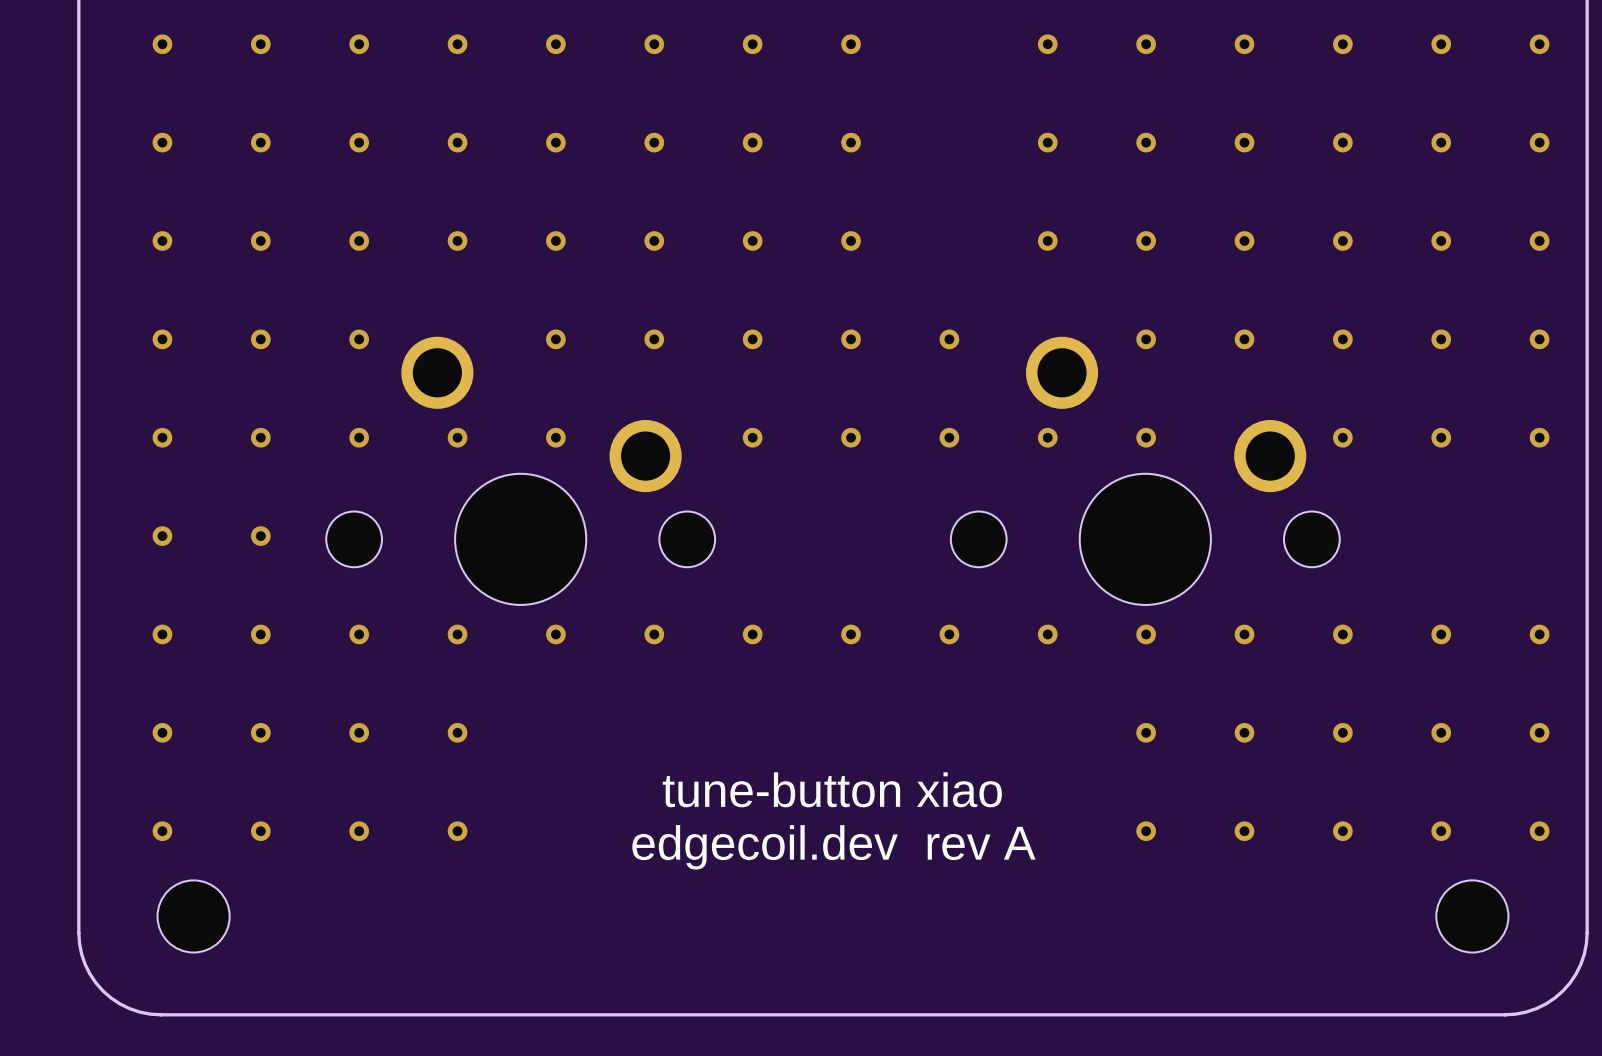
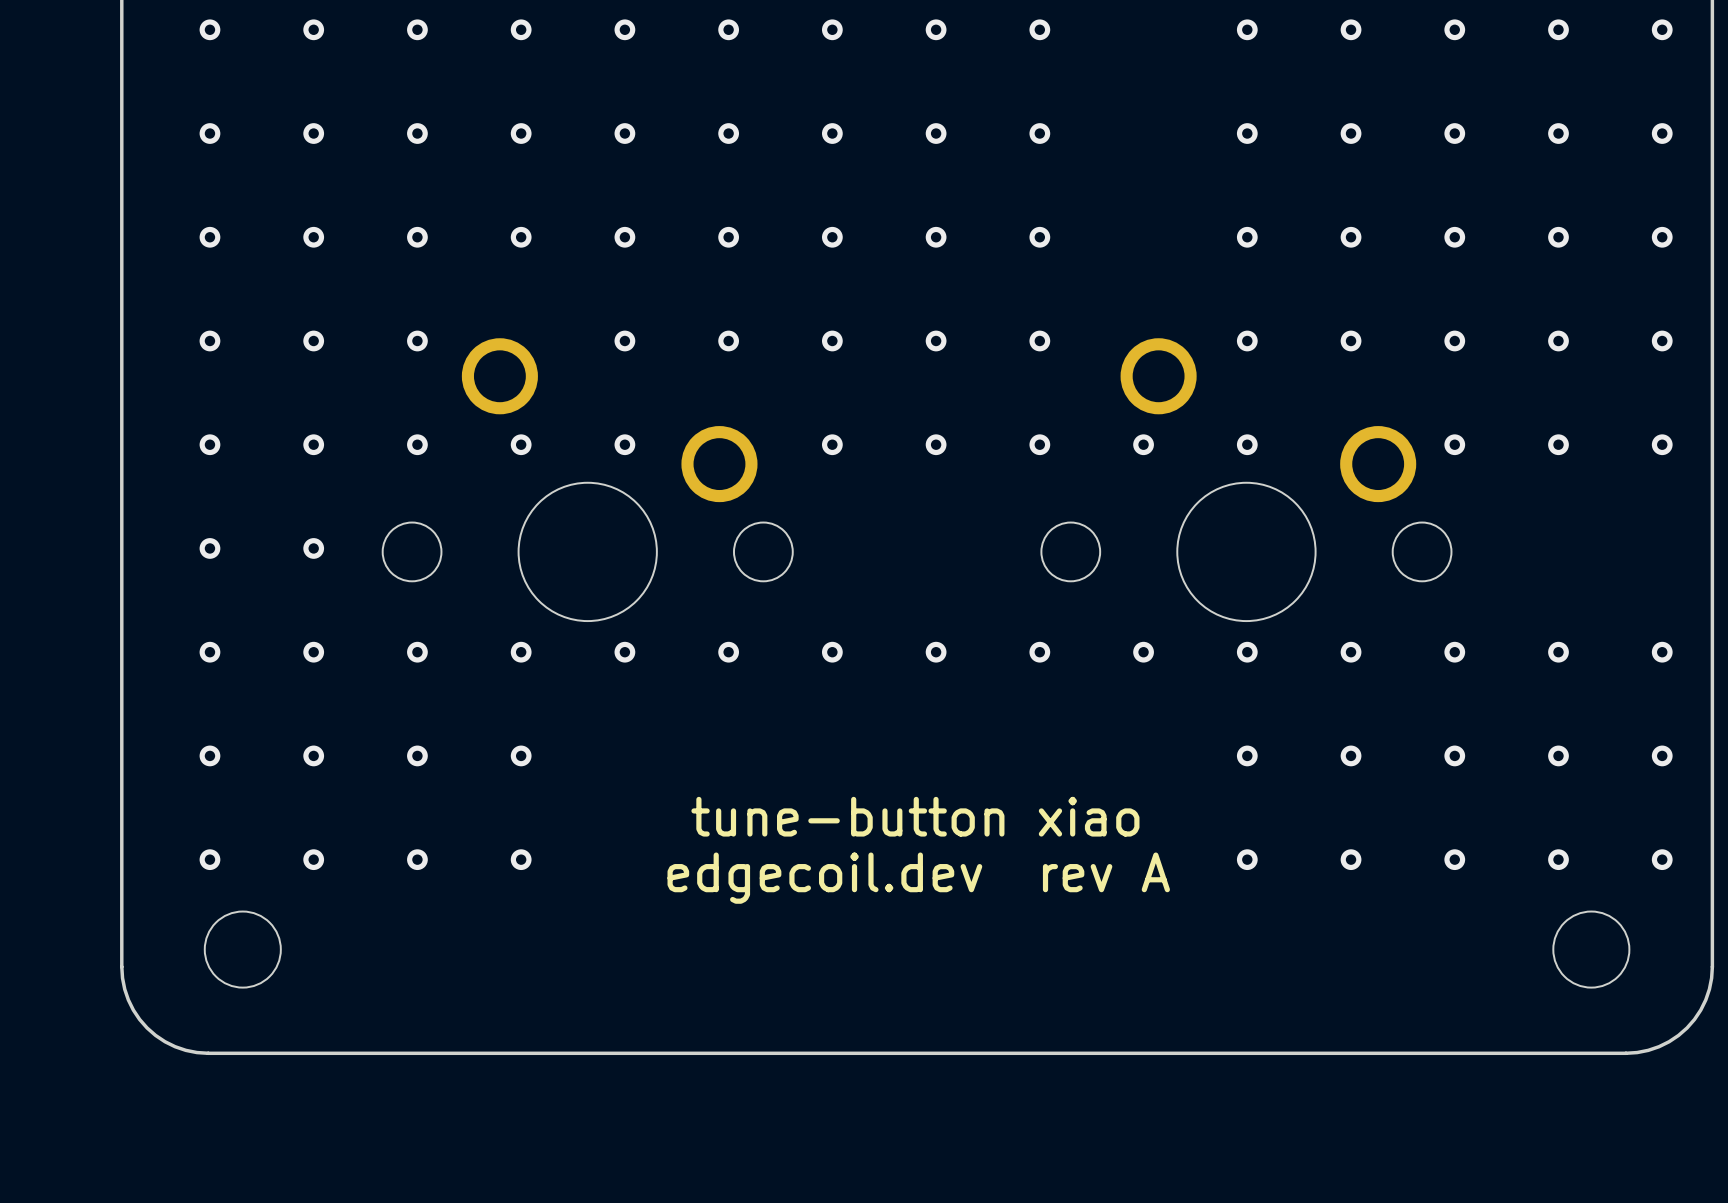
via: none -> (1039, 29)
via: (1047, 44) -> none
via: none -> (1039, 133)
via: (1047, 142) -> none
via: none -> (1039, 237)
via: (1047, 240) -> none

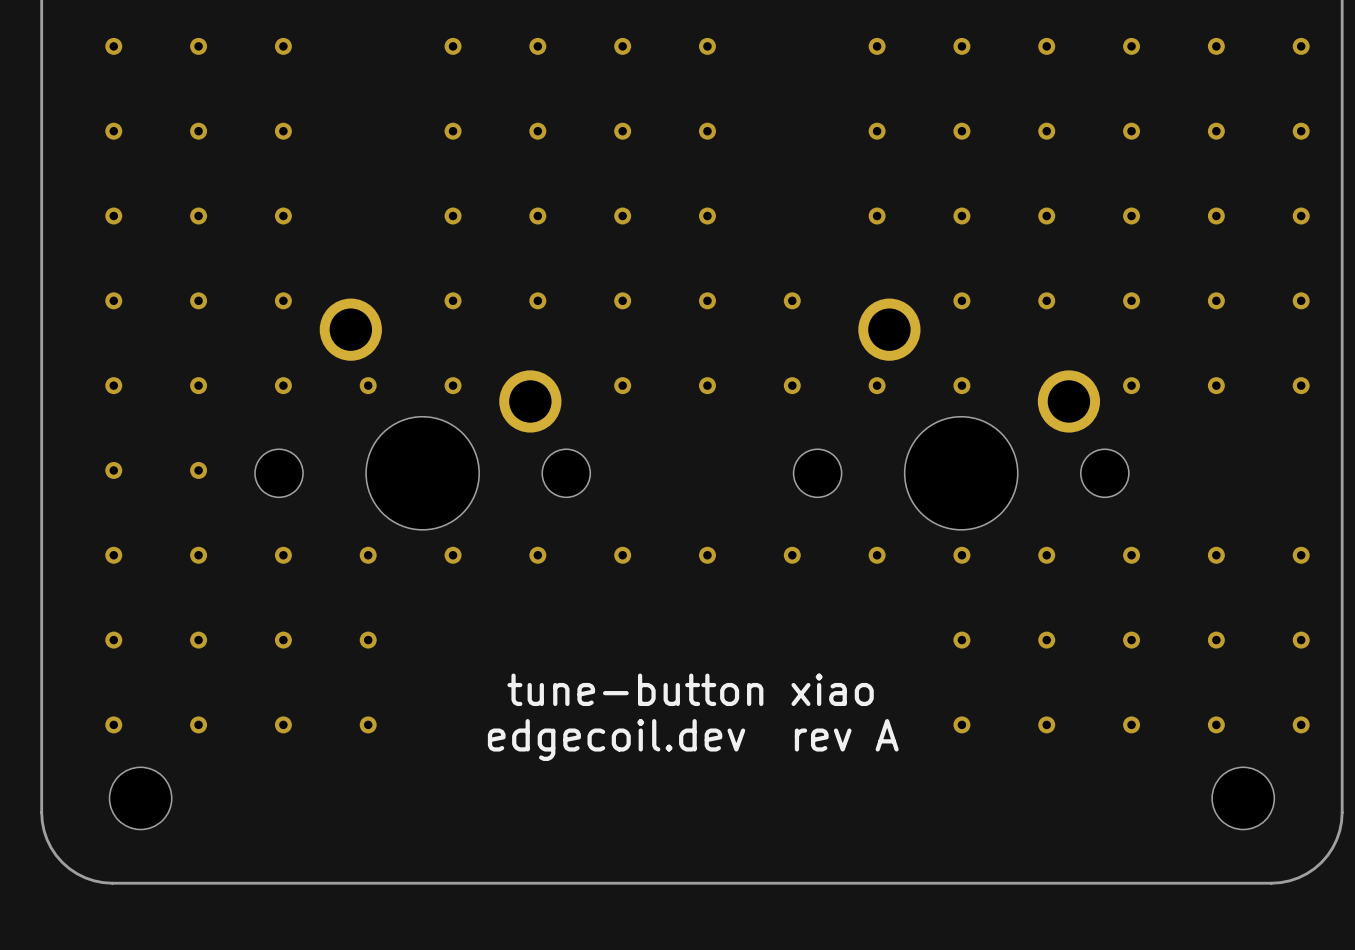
via: (521, 29) -> none
via: (1039, 29) -> none
via: none -> (877, 46)
via: (521, 133) -> none
via: (1039, 133) -> none
via: none -> (877, 131)
via: (521, 237) -> none
via: (1039, 237) -> none
via: none -> (877, 216)

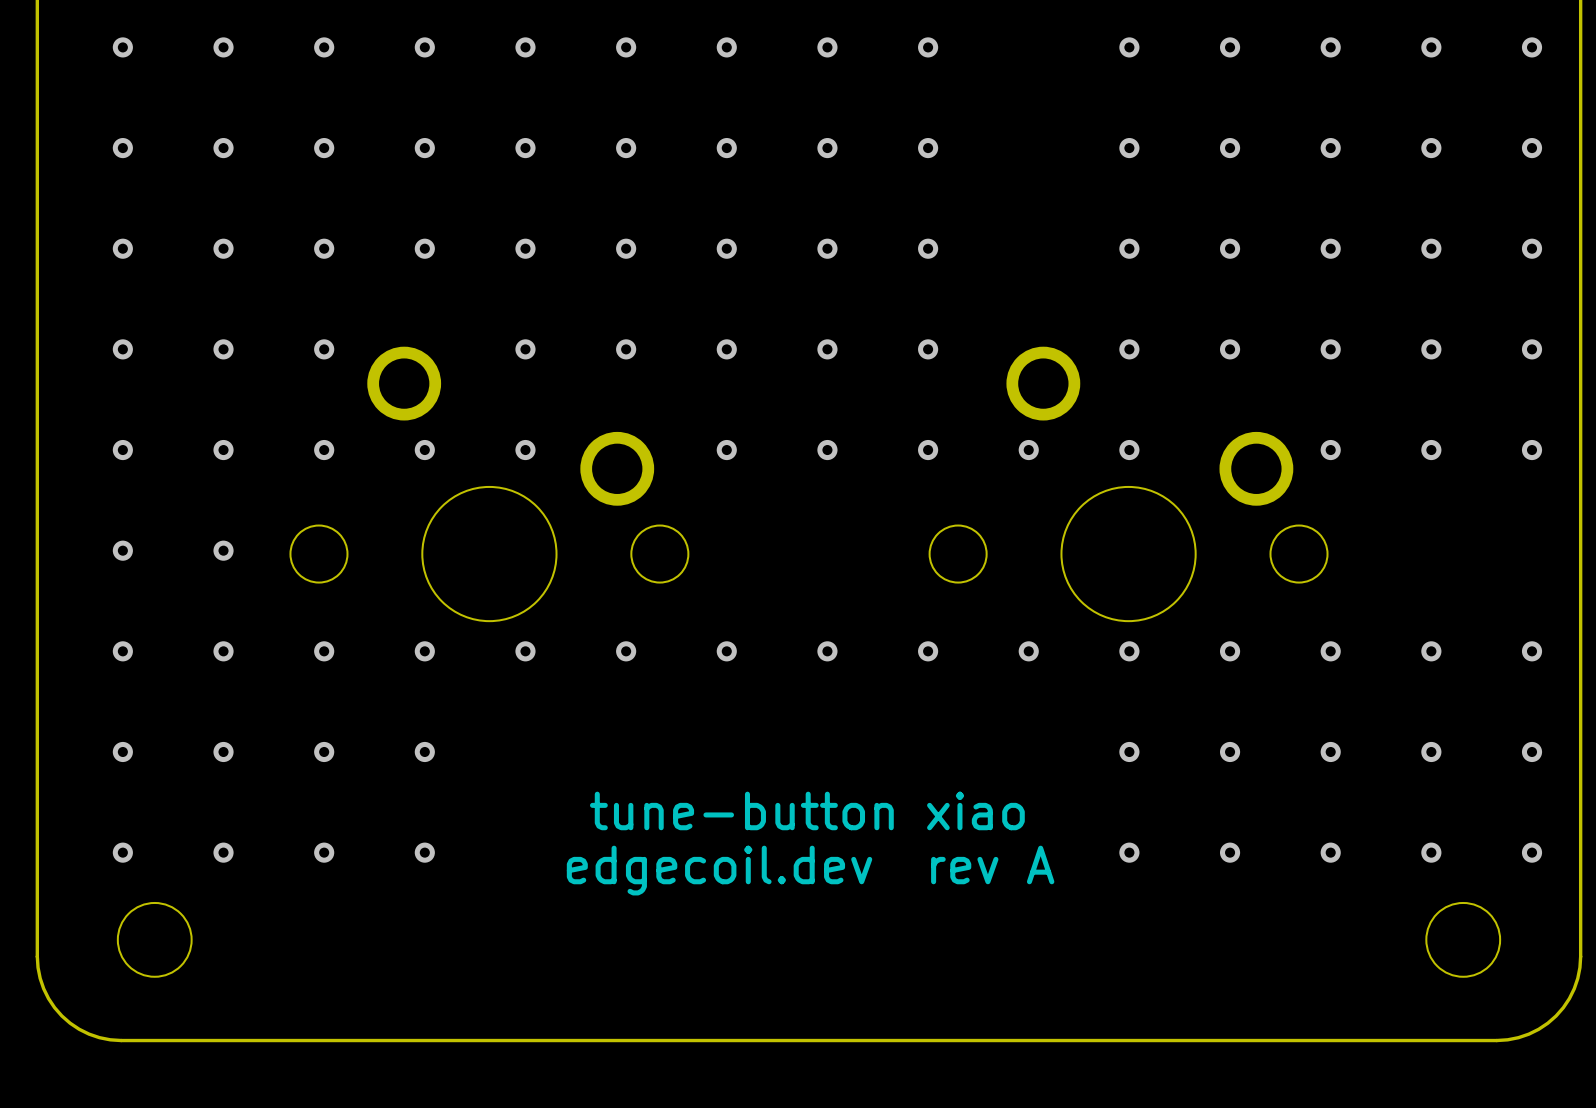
via: none -> (424, 47)
via: none -> (928, 47)
via: (877, 46) -> none
via: none -> (424, 148)
via: none -> (928, 148)
via: (877, 131) -> none
via: none -> (424, 248)
via: none -> (928, 248)
via: (877, 216) -> none

